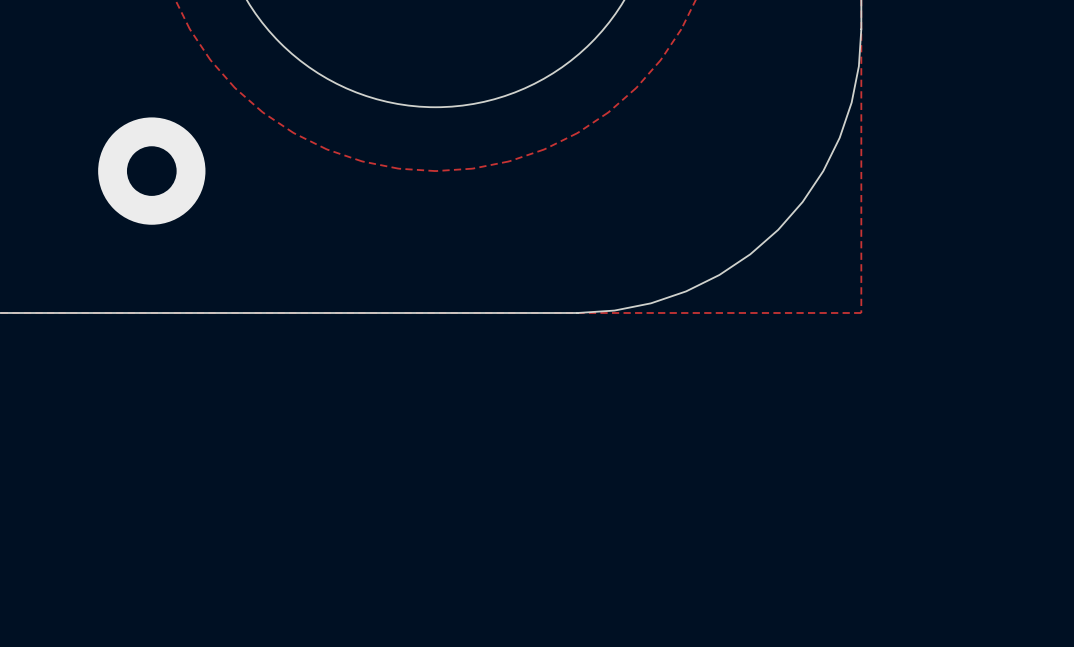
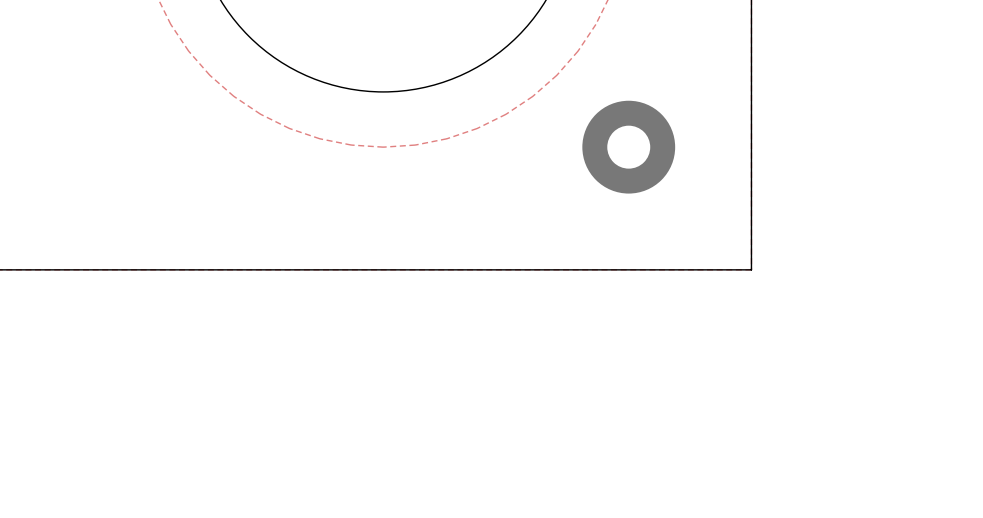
board edge: (861, 29) (858, 66) (851, 102) (839, 137) (823, 171) (802, 201) (778, 229) (750, 254) (719, 274) (686, 291) (650, 303) (614, 310) (577, 312) -> (751, 24) (751, 269) (506, 269)
via: (151, 171) -> none
via: none -> (628, 147)

